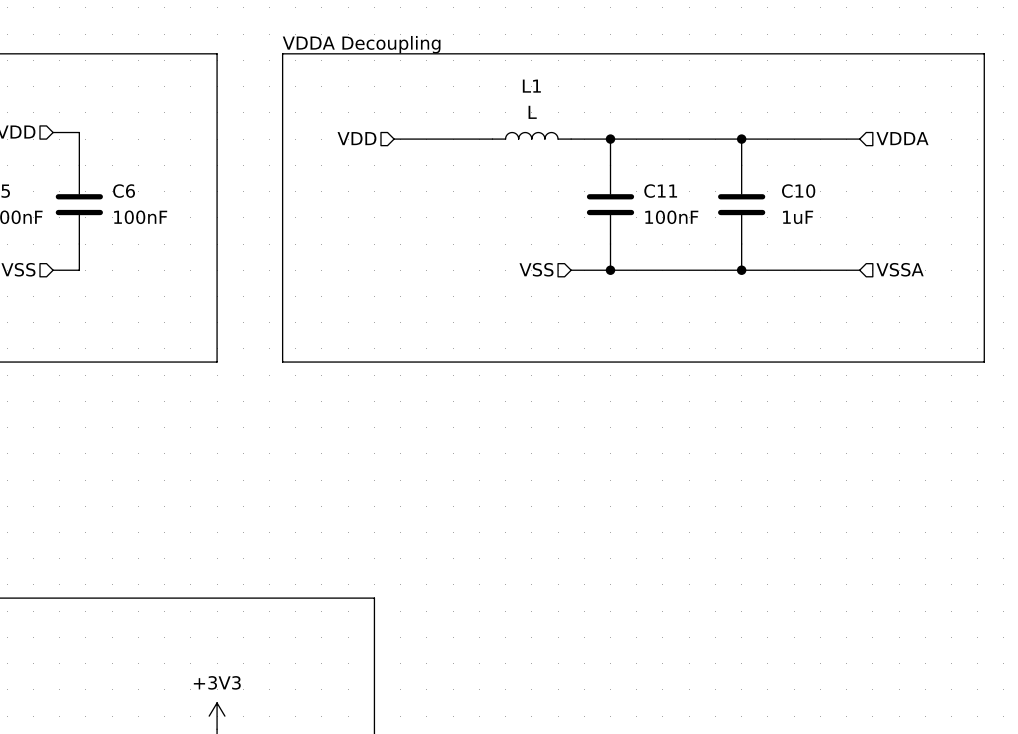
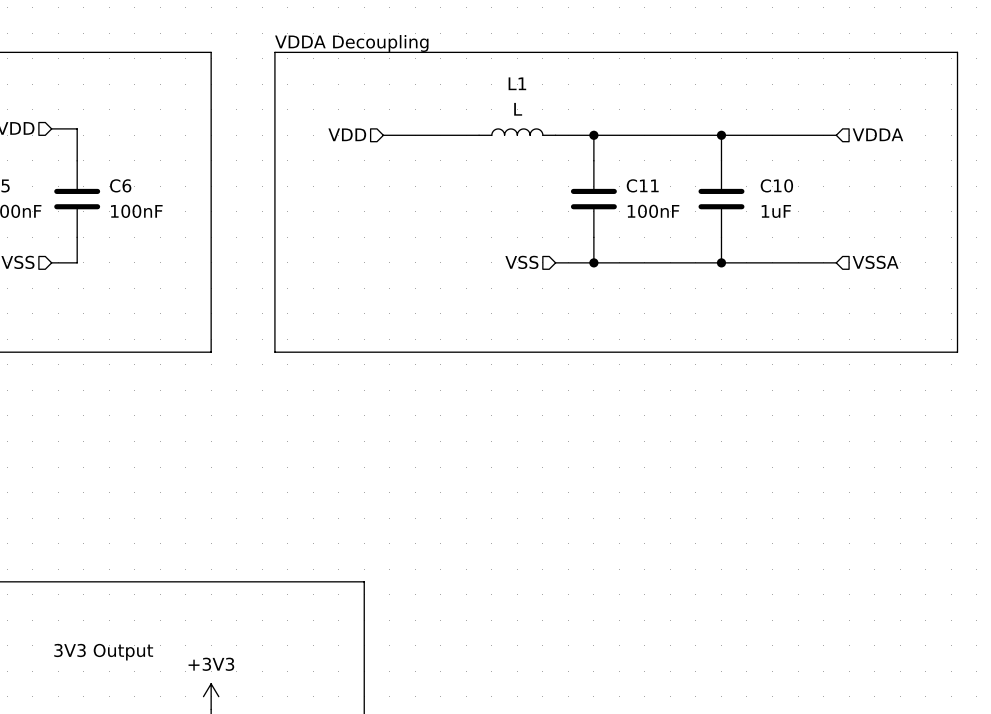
text: none -> 3V3 Output (103, 652)

